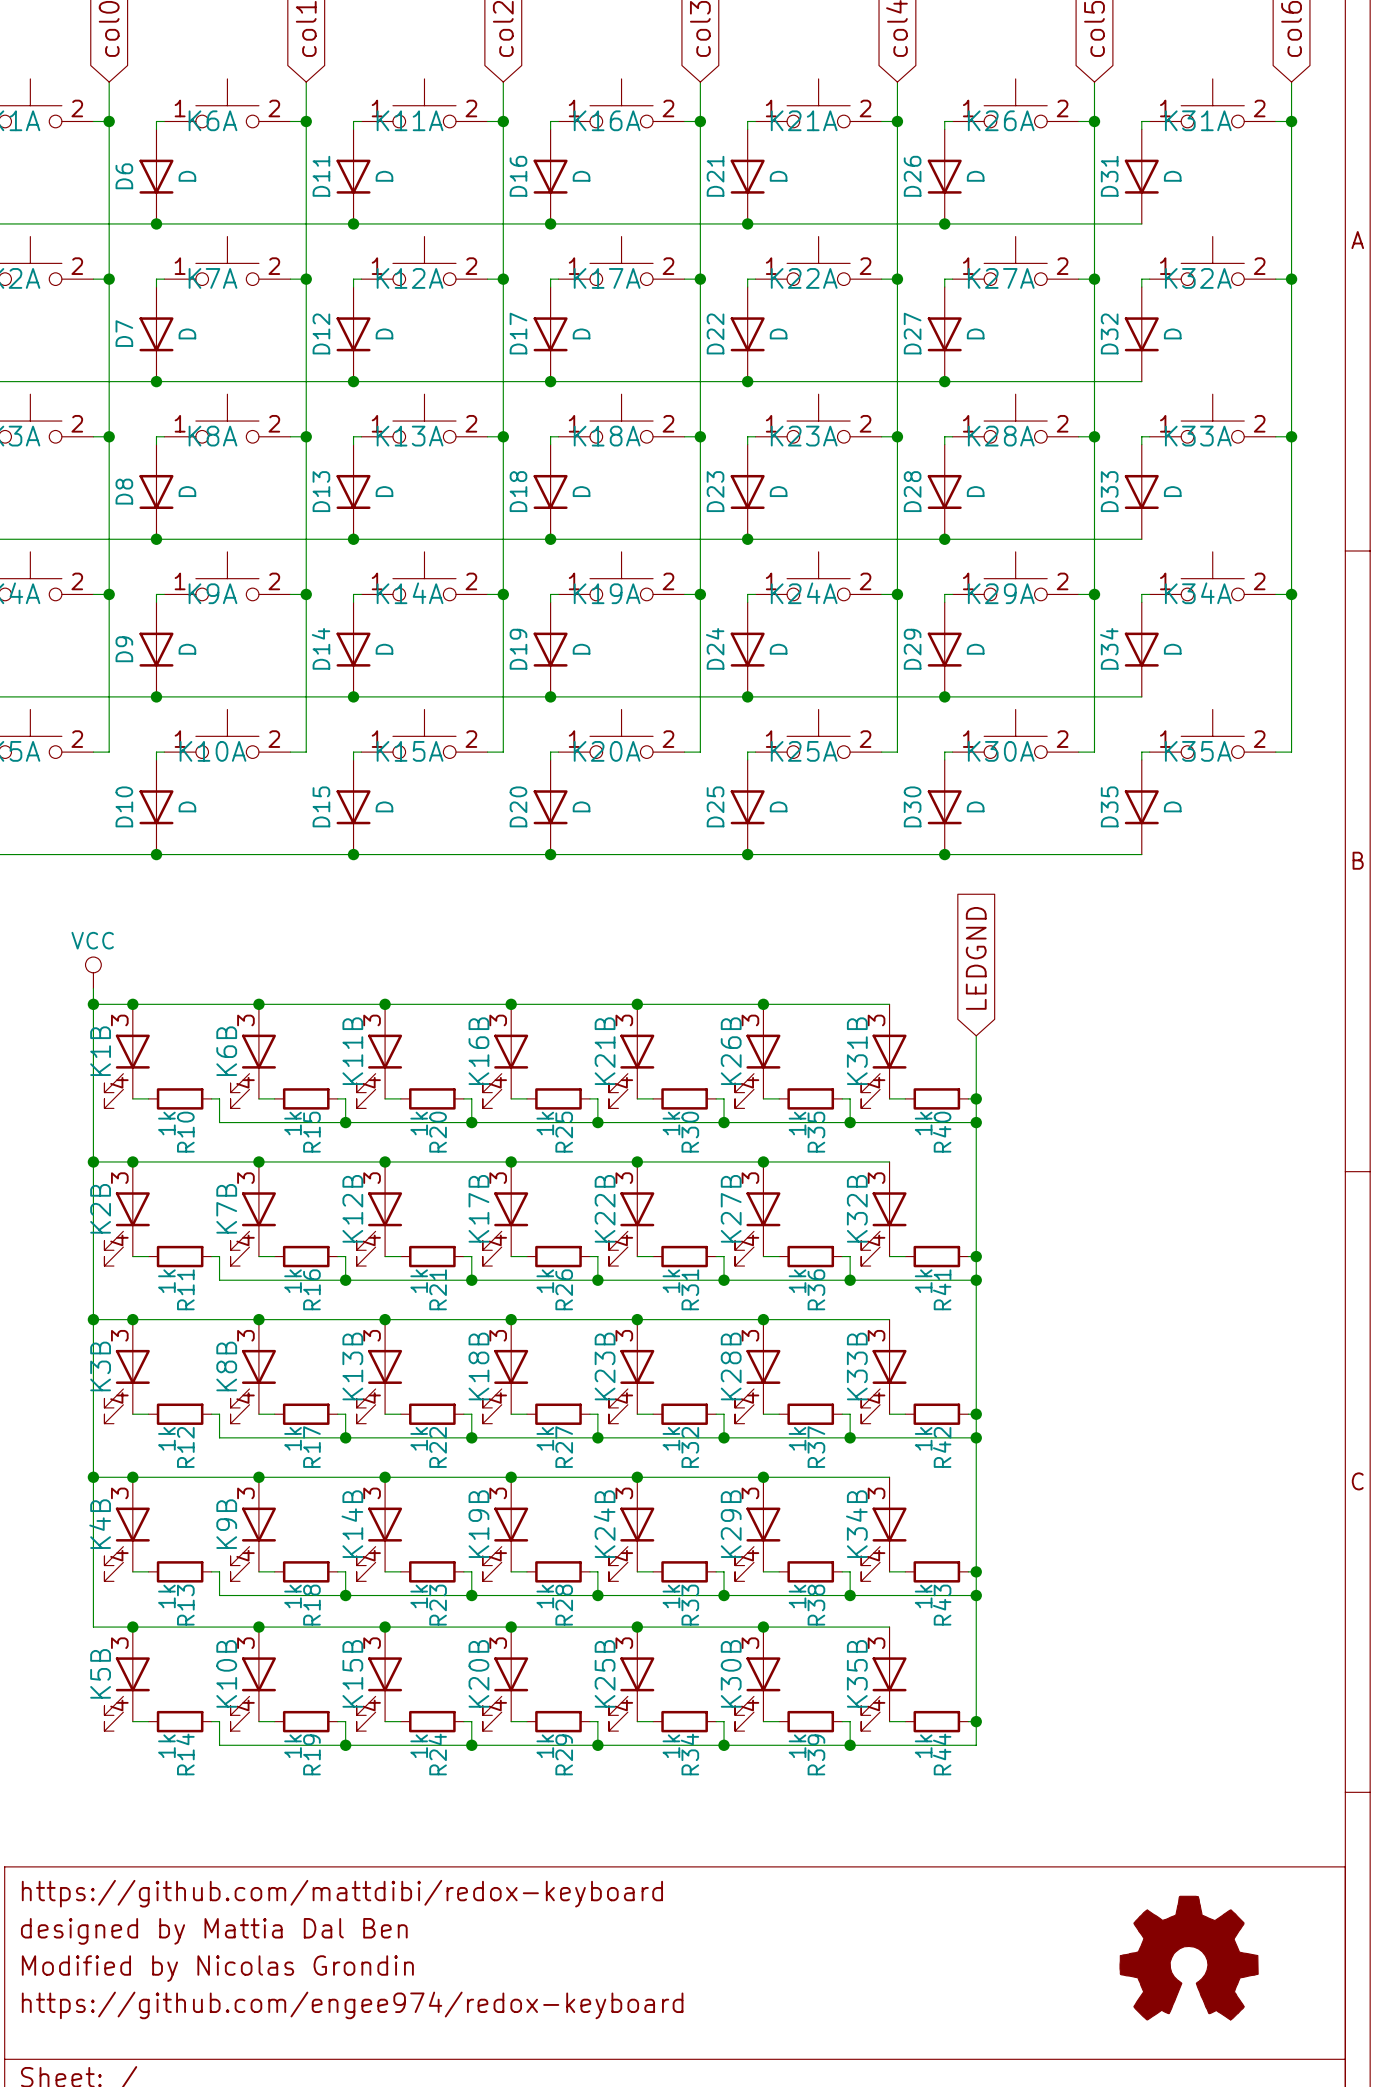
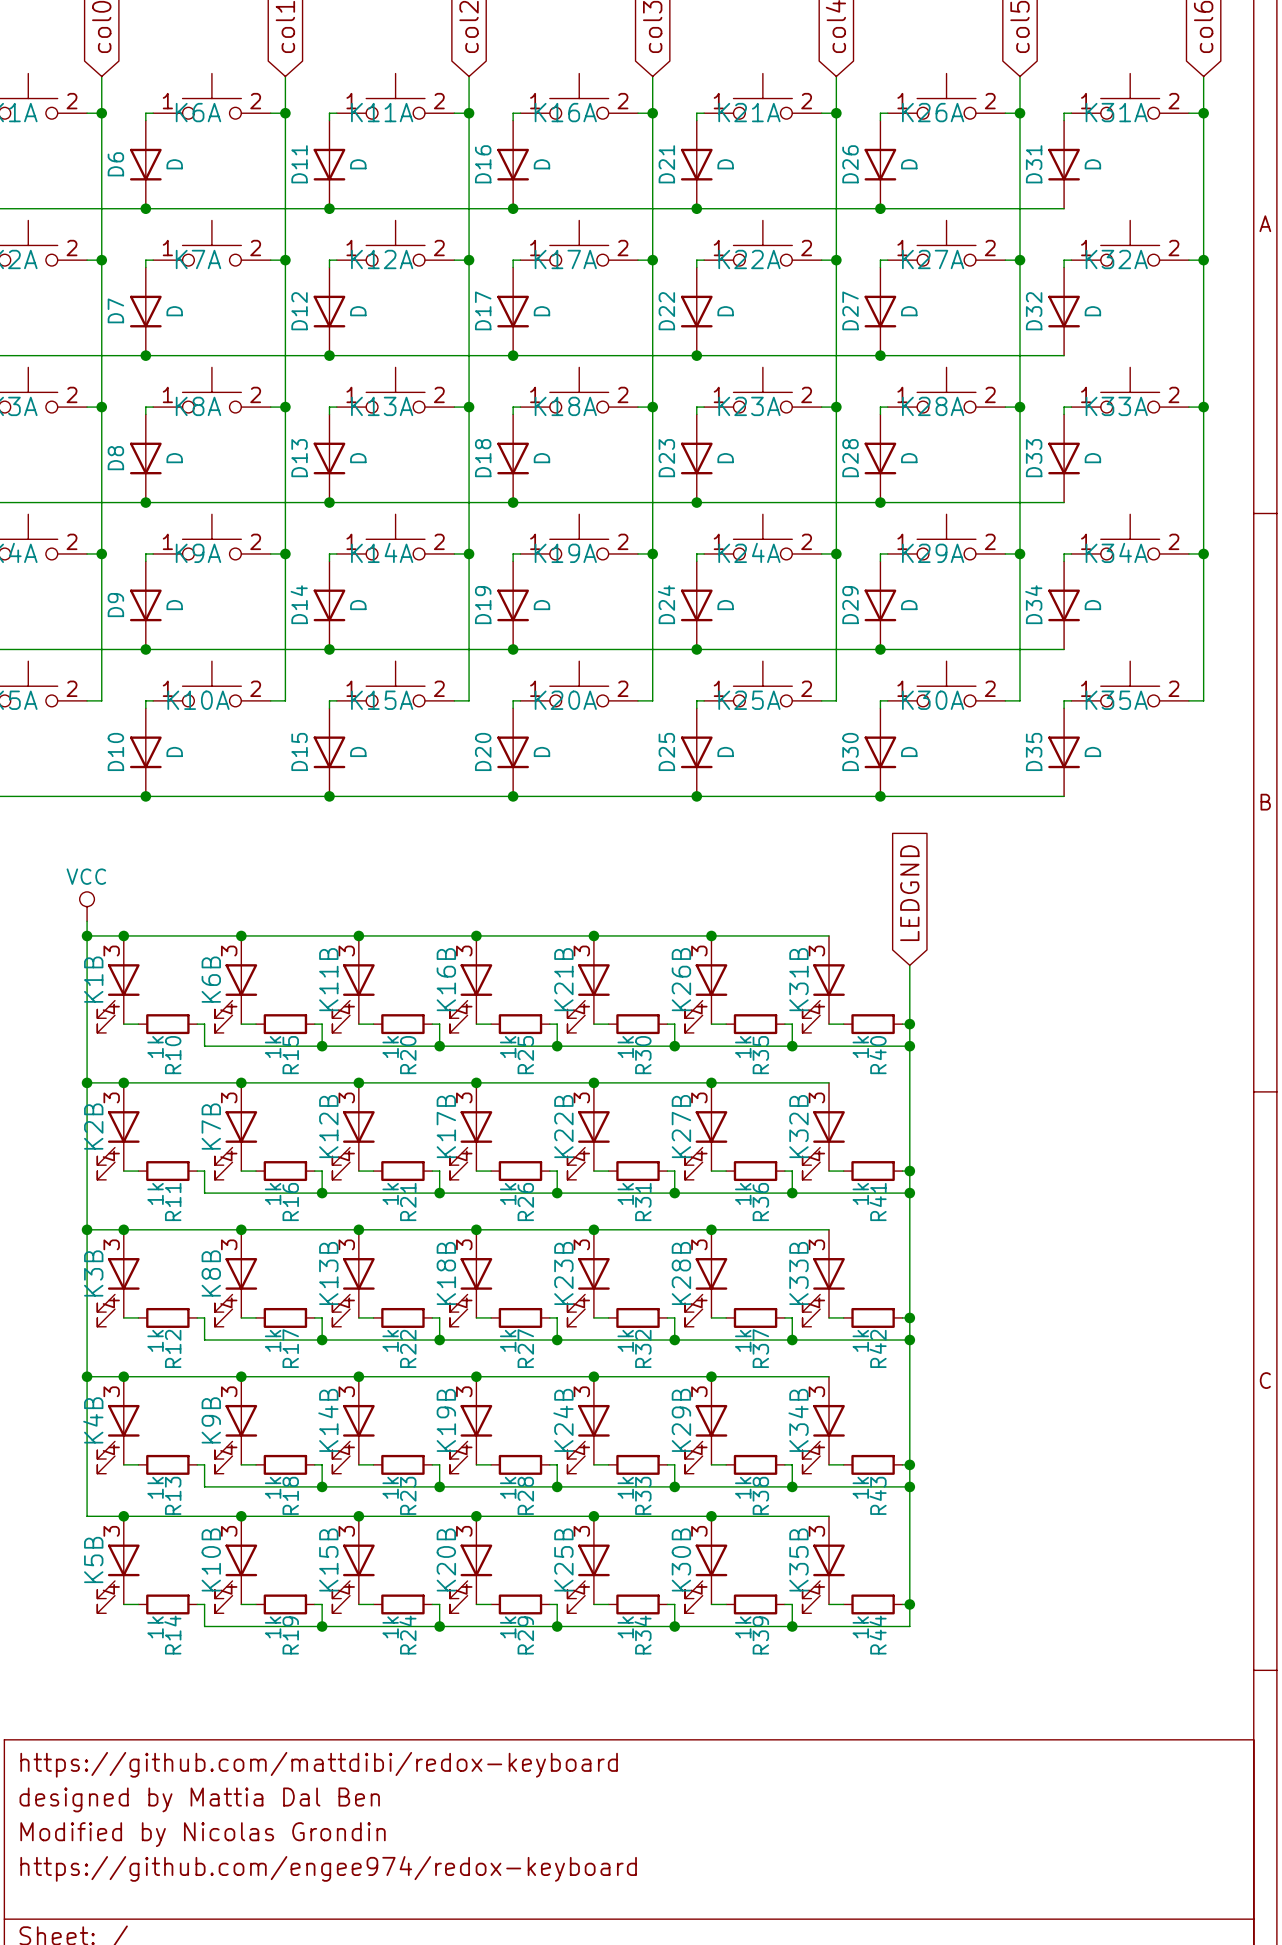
power symbol: (1189, 1958) -> none

